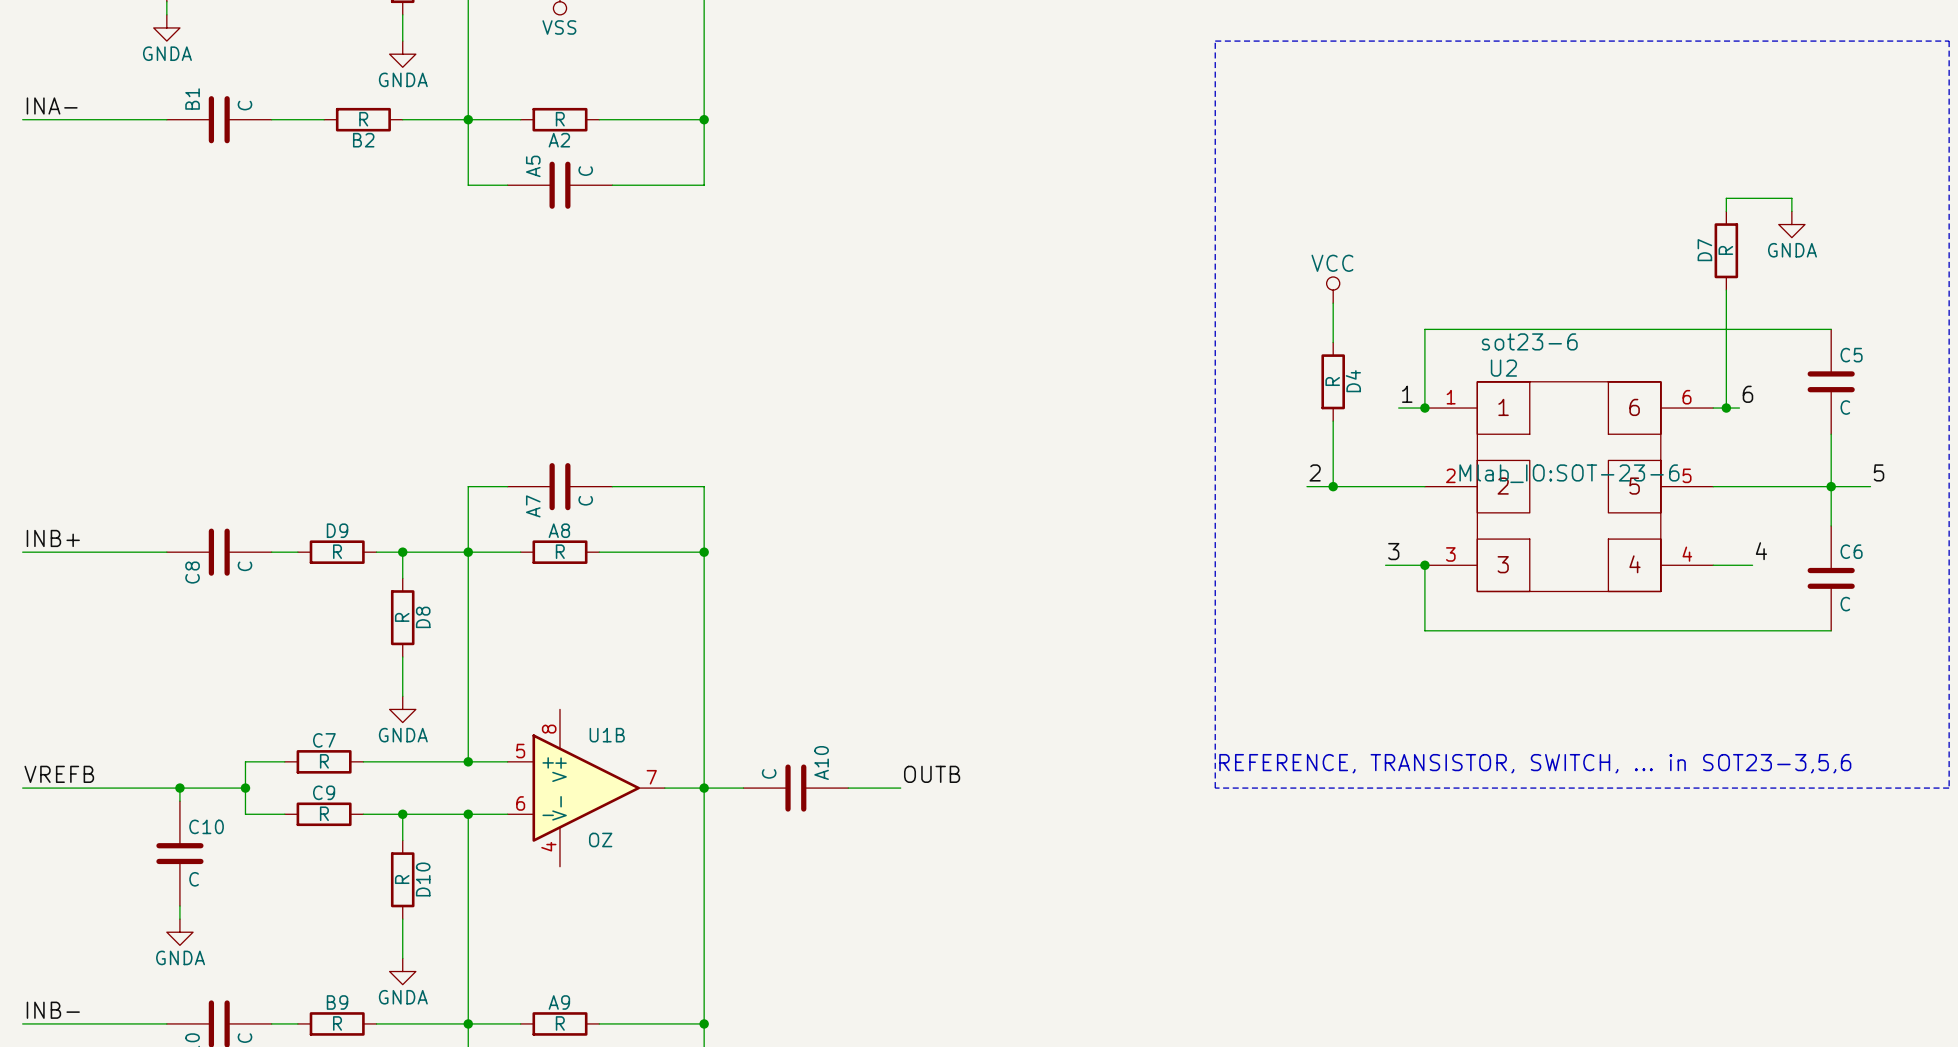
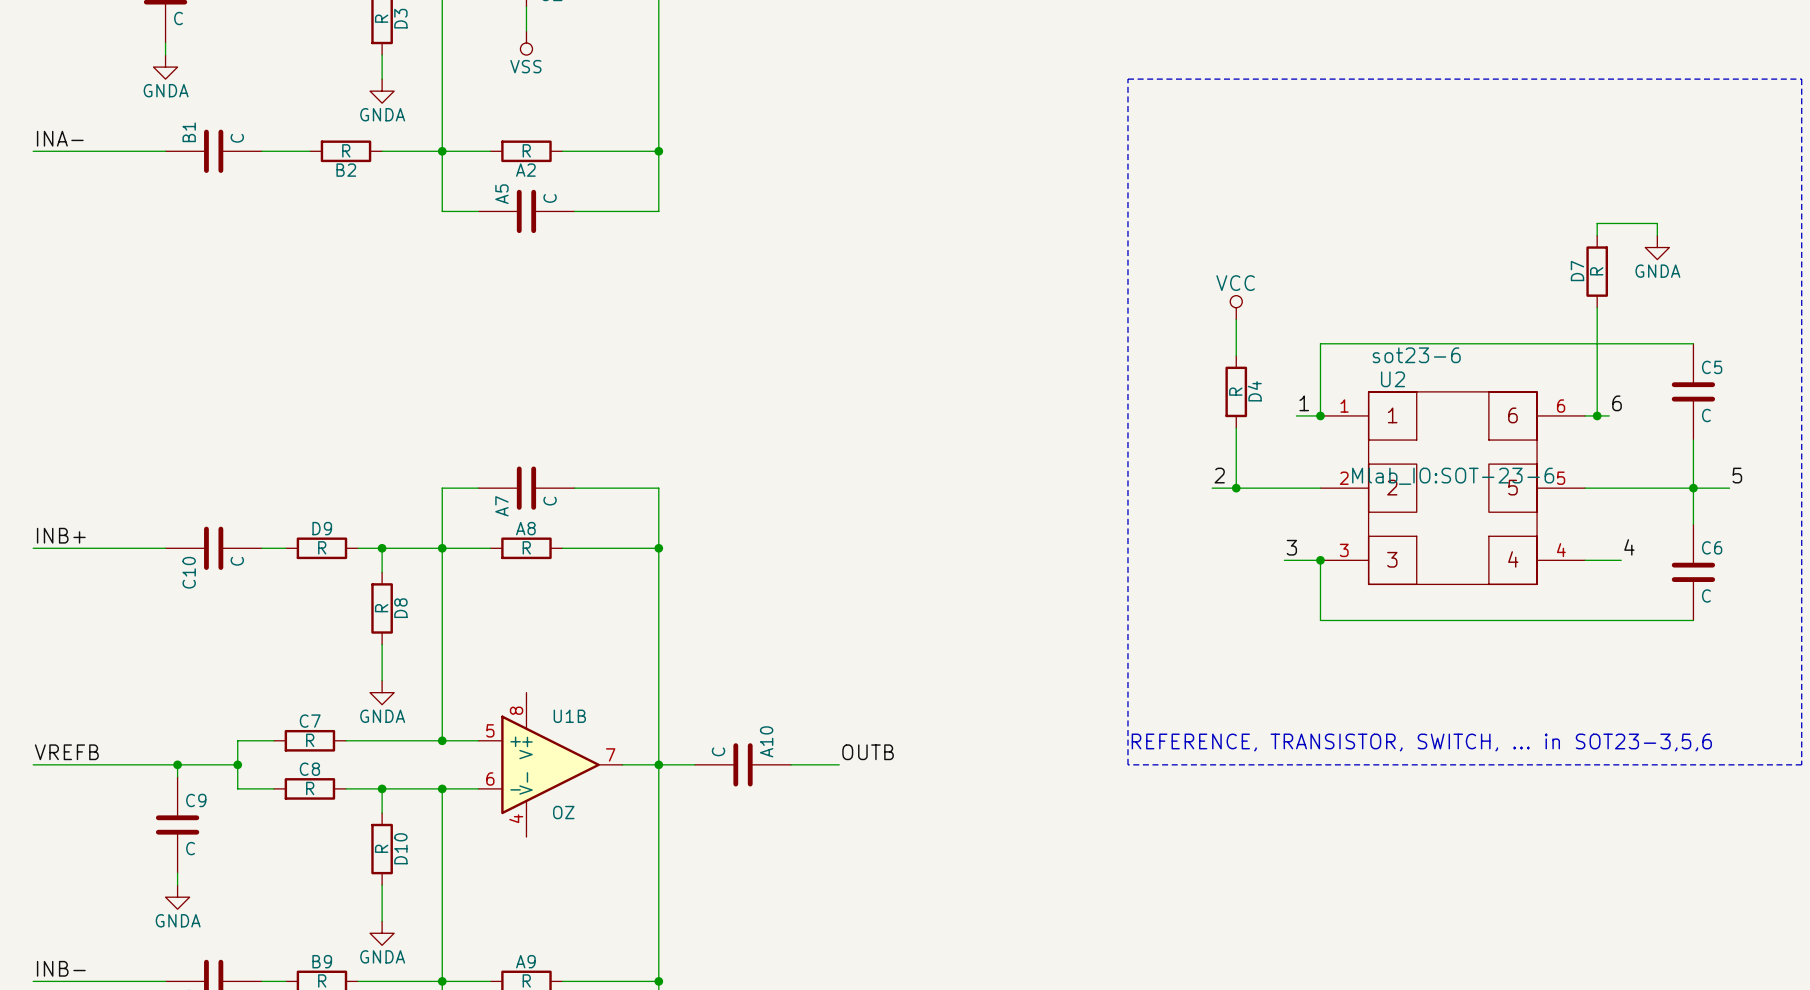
C8 name: C8 (192, 572) -> C10 (189, 572)
C9 name: C9 (324, 792) -> C8 (309, 769)
C10 name: C10 (206, 826) -> C9 (196, 800)

